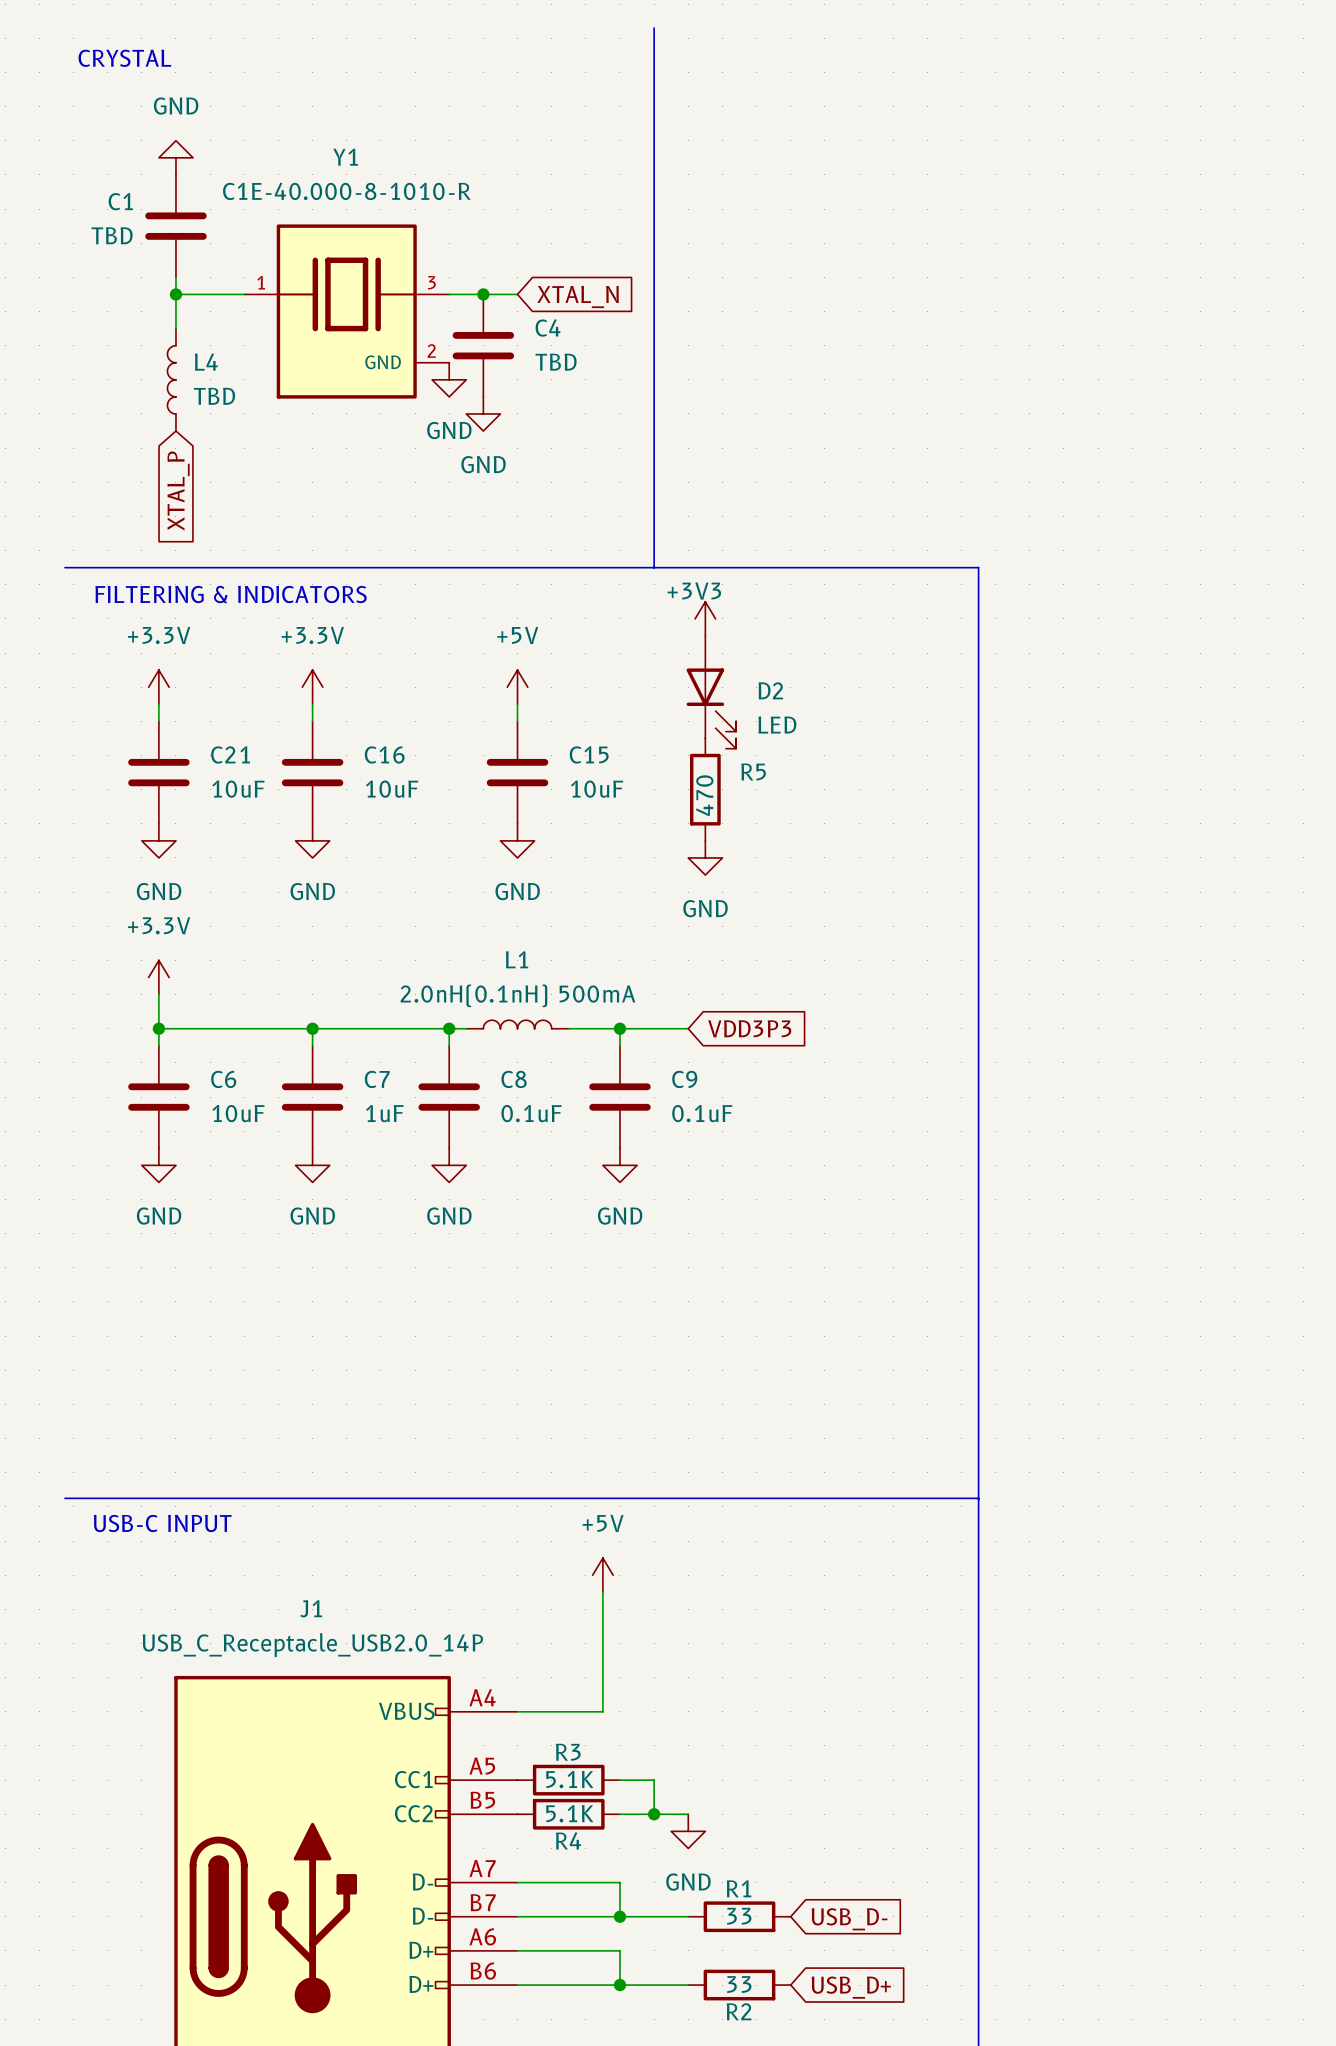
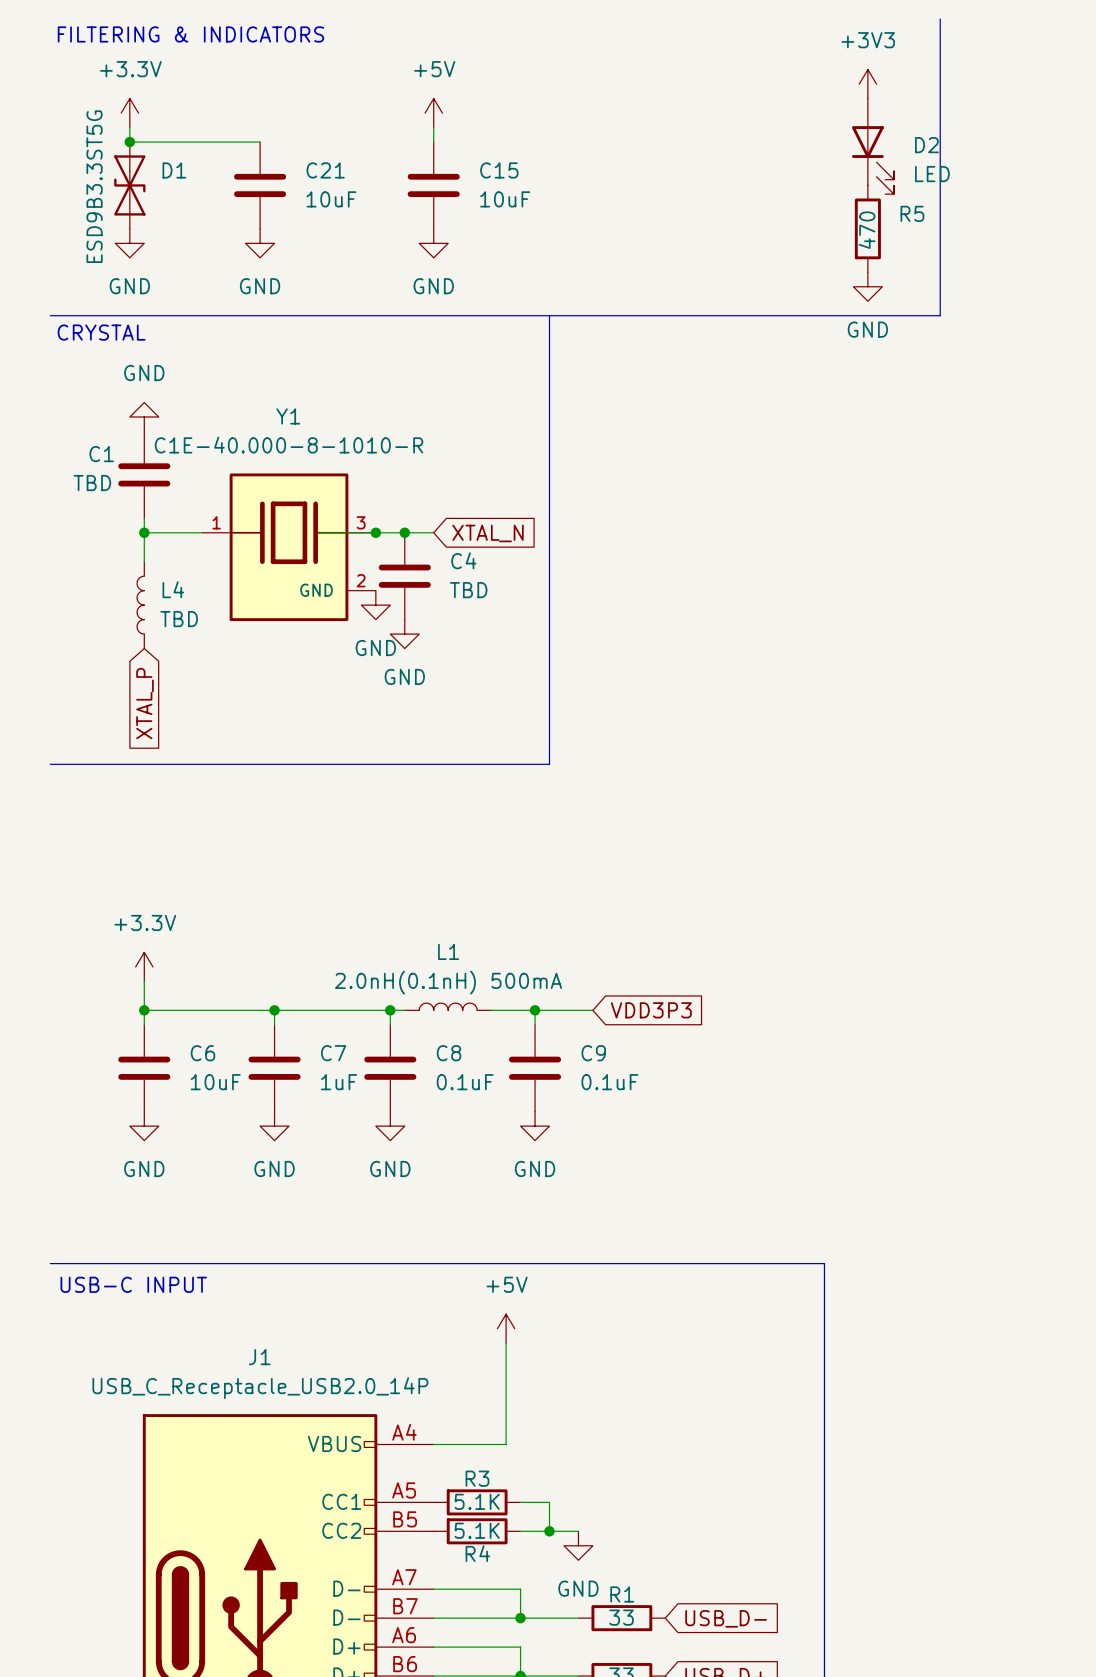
line: (654, 28) (654, 379) -> none
line: none -> (940, 19) (940, 315) (50, 315)
text: none -> FILTERING & INDICATORS (190, 34)
text: CRYSTAL (124, 58) -> none
power symbol: none -> +3V3 (867, 84)
power symbol: none -> +3.3V (129, 113)
power symbol: none -> +5V (433, 113)
wire: none -> (129, 127) (129, 142) (260, 142)
power symbol: GND (175, 157) -> none
wire: none -> (433, 127) (433, 142)
junction: none -> (129, 142)
D1: none -> ESD9B3.3ST5G (129, 185)
C1 position: (175, 226) -> (144, 474)
wire: (175, 277) (175, 328) -> none
power symbol: none -> GND (129, 243)
wire: (175, 294) (244, 294) -> none
junction: (175, 294) -> none
power symbol: none -> GND (260, 243)
wire: (449, 294) (517, 294) -> none
junction: (483, 294) -> none
power symbol: none -> GND (433, 243)
global label: XTAL_N (578, 296) -> none
Y1 position: (346, 311) -> (289, 547)
C4 position: (483, 345) -> (404, 576)
power symbol: none -> GND (867, 286)
L4 position: (171, 379) -> (140, 605)
power symbol: GND (449, 379) -> none
text: none -> CRYSTAL (101, 332)
power symbol: GND (483, 413) -> none
global label: XTAL_P (178, 491) -> none
power symbol: none -> GND (144, 417)
line: (64, 567) (978, 567) (978, 1498) -> none
line: none -> (549, 474) (549, 764) (50, 764)
text: FILTERING & INDICATORS (231, 594) -> none
wire: none -> (144, 518) (144, 561)
power symbol: +3V3 (705, 618) -> none
wire: none -> (144, 532) (202, 532)
junction: none -> (144, 532)
wire: none -> (317, 532) (433, 532)
junction: none -> (375, 532)
junction: none -> (404, 532)
global label: none -> XTAL_N (488, 533)
power symbol: +3.3V (158, 687) -> none
power symbol: +3.3V (312, 687) -> none
power symbol: +5V (517, 687) -> none
D2 position: (711, 692) -> (872, 146)
wire: (158, 704) (158, 721) -> none
wire: (517, 704) (517, 721) -> none
power symbol: none -> GND (375, 605)
power symbol: none -> GND (404, 634)
C21 position: (158, 772) -> (260, 185)
C16: 10uF (312, 772) -> none
C15 position: (517, 772) -> (433, 185)
R5 position: (705, 789) -> (867, 228)
global label: none -> XTAL_P (144, 703)
power symbol: GND (158, 840) -> none
power symbol: GND (312, 840) -> none
power symbol: GND (517, 840) -> none
power symbol: GND (705, 857) -> none
power symbol position: +3.3V (158, 977) -> +3.3V (144, 966)
wire: (158, 994) (158, 1045) -> (144, 981) (144, 1024)
L1 position: (517, 1024) -> (448, 1006)
wire: (158, 1028) (466, 1028) -> (144, 1010) (404, 1010)
junction: (158, 1028) -> none
wire: (312, 1028) (312, 1045) -> (274, 1010) (274, 1024)
junction: (312, 1028) -> none
wire: (449, 1028) (449, 1045) -> (390, 1010) (390, 1024)
junction: (449, 1028) -> none
wire: (568, 1028) (688, 1028) -> (491, 1010) (592, 1010)
wire: (619, 1028) (619, 1045) -> (535, 1010) (535, 1024)
junction: (619, 1028) -> none
global label position: VDD3P3 (749, 1028) -> VDD3P3 (651, 1010)
C6 position: (158, 1097) -> (144, 1068)
C7 position: (312, 1097) -> (274, 1068)
C8 position: (449, 1097) -> (390, 1068)
C9 position: (619, 1097) -> (535, 1068)
power symbol: GND (158, 1165) -> none
power symbol: GND (312, 1165) -> none
power symbol: GND (449, 1165) -> none
power symbol: GND (619, 1165) -> none
junction: none -> (144, 1010)
junction: none -> (274, 1010)
junction: none -> (390, 1010)
junction: none -> (535, 1010)
power symbol: none -> GND (144, 1126)
power symbol: none -> GND (274, 1126)
power symbol: none -> GND (390, 1126)
power symbol: none -> GND (535, 1126)

